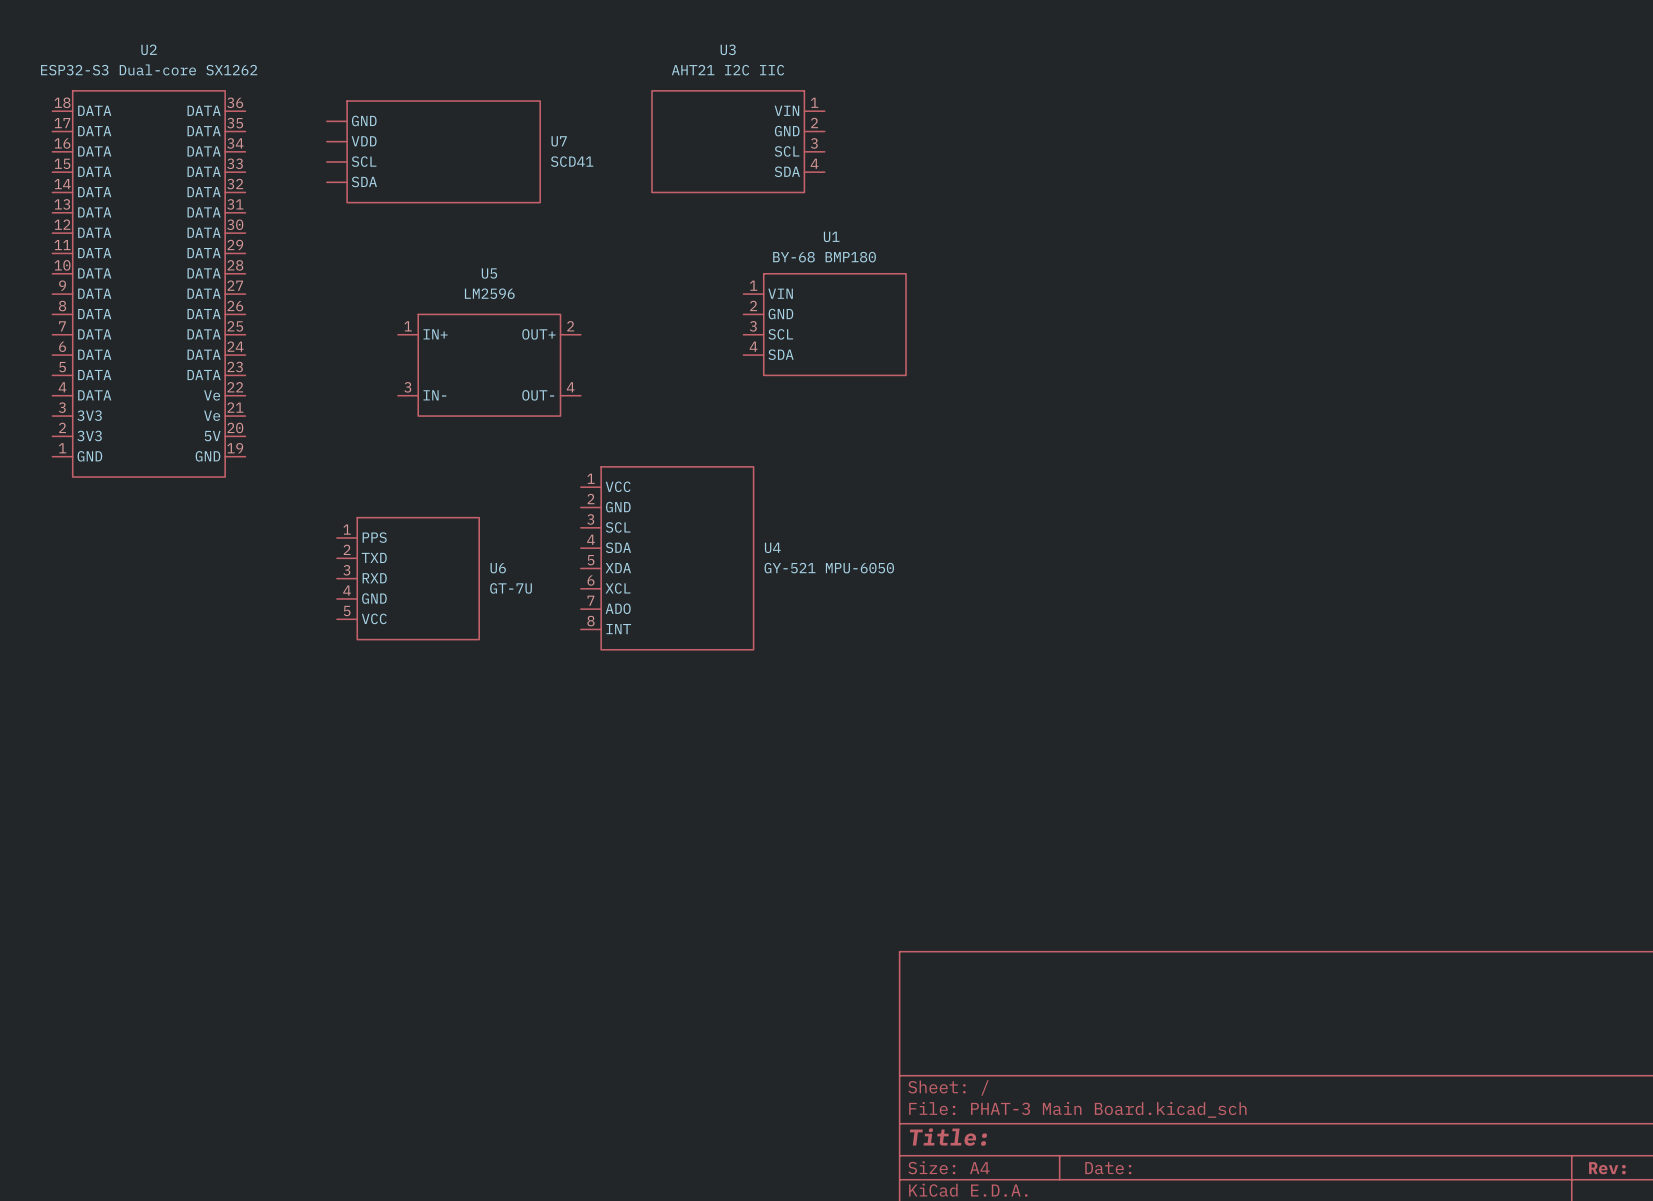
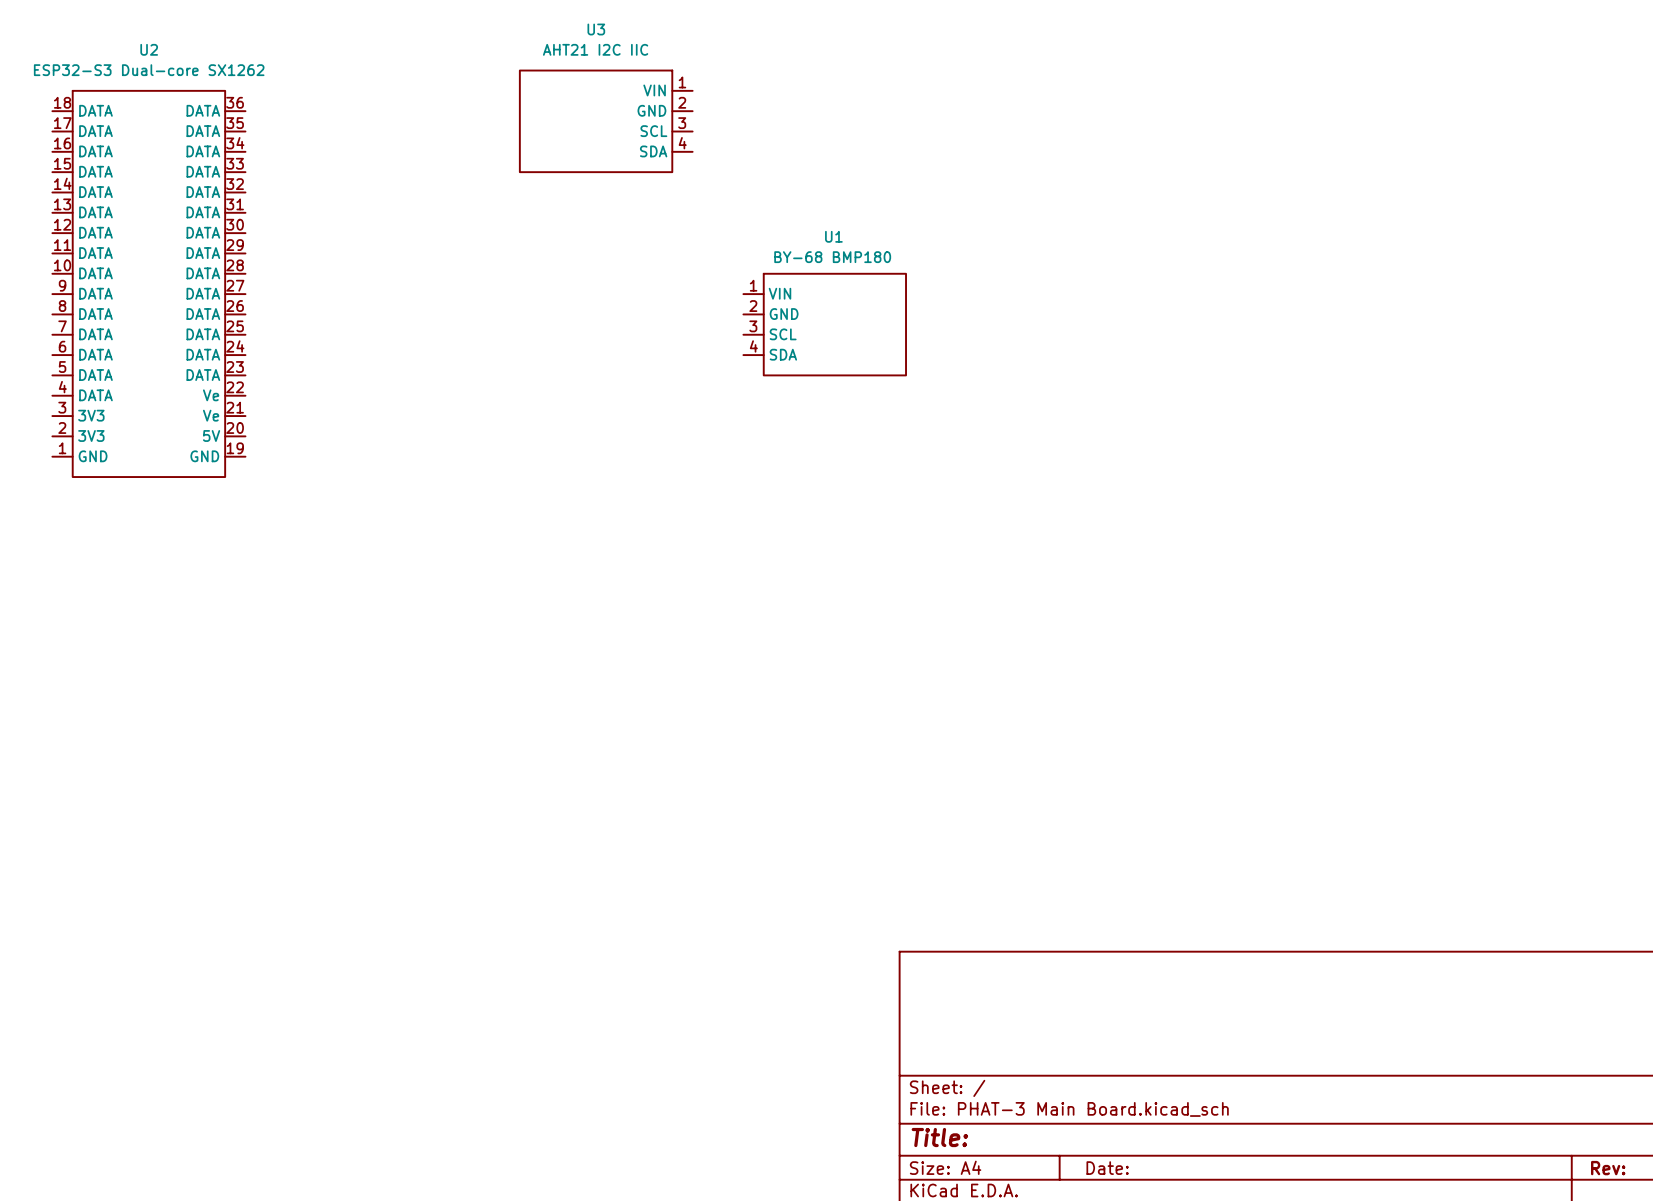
U3 position: (738, 141) -> (606, 121)
U7: SCD41 (433, 151) -> none
U5: LM2596 (489, 365) -> none
U4: GY-521 MPU-6050 (667, 558) -> none
U6: GT-7U (408, 578) -> none

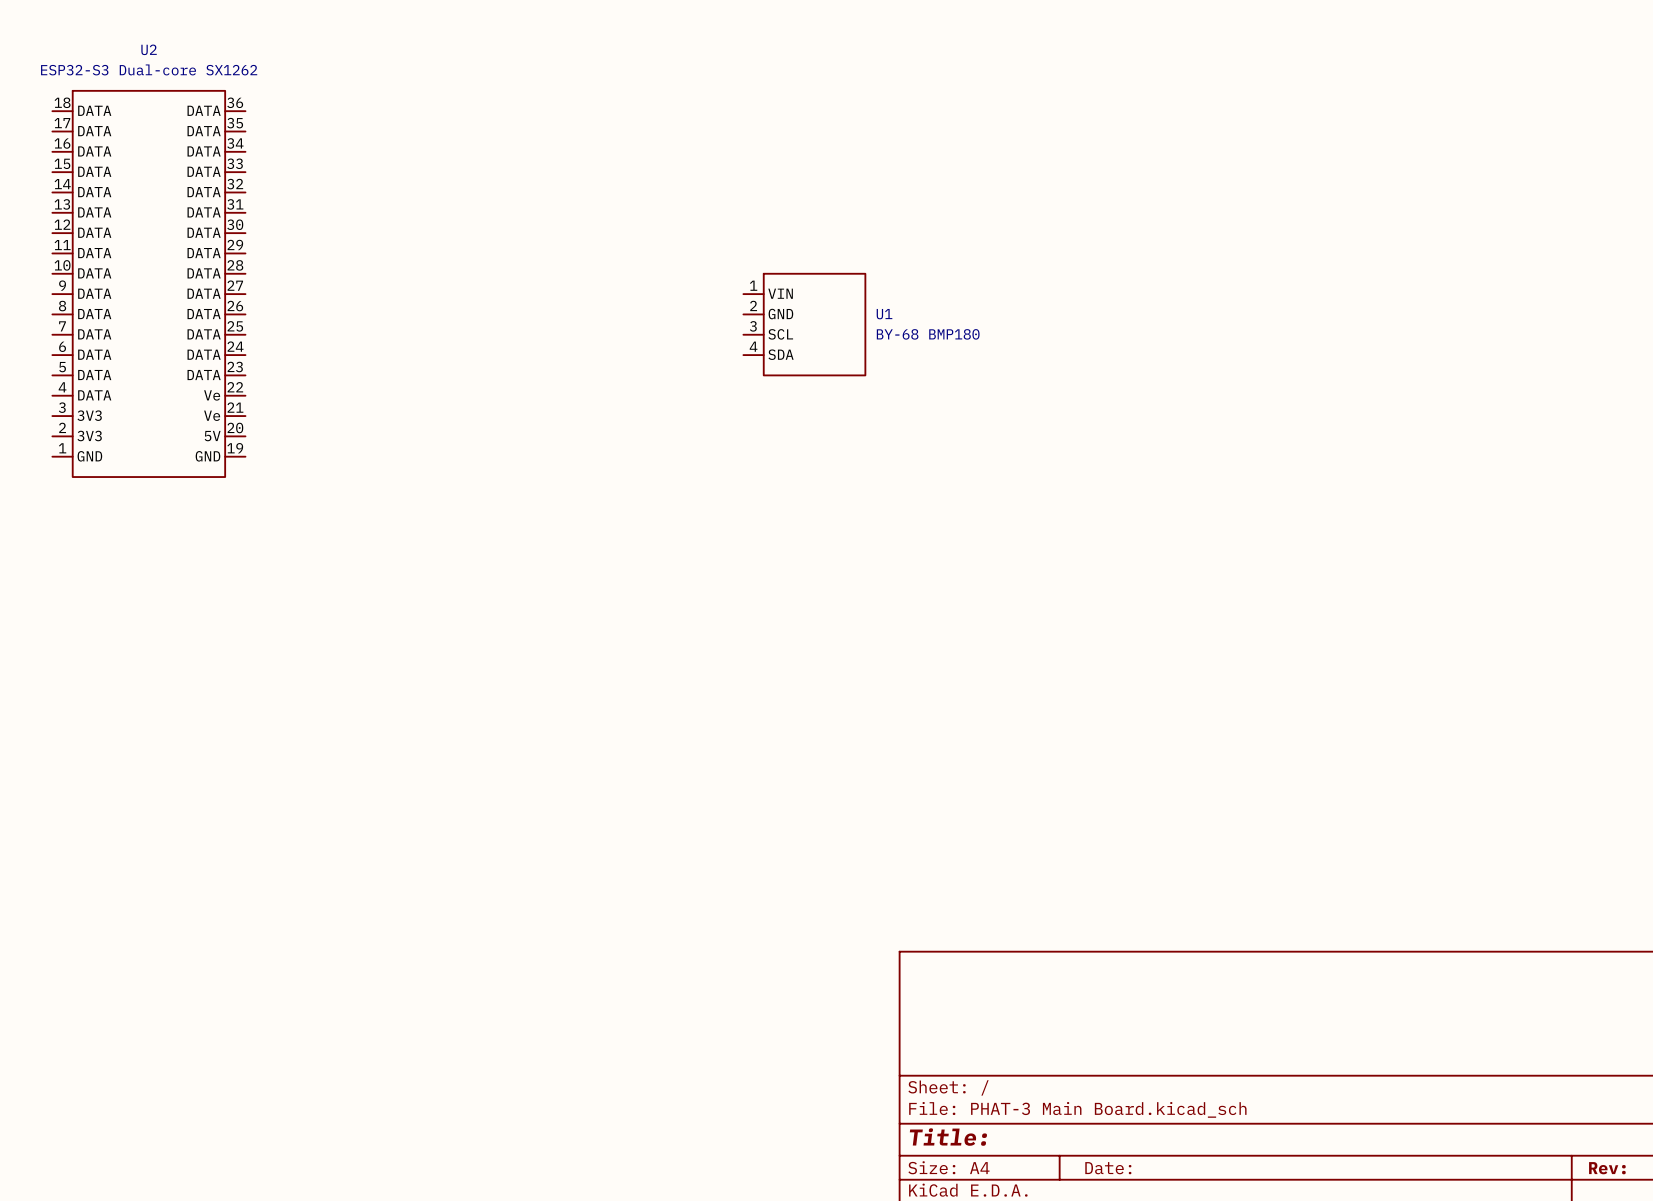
U3: AHT21 I2C IIC (606, 121) -> none
U1 name position: U1 (833, 236) -> U1 (884, 314)
U1 value position: BY-68 BMP180 (832, 257) -> BY-68 BMP180 (928, 334)
U1 symbol: [743, 273, 907, 376] -> [743, 273, 866, 376]

